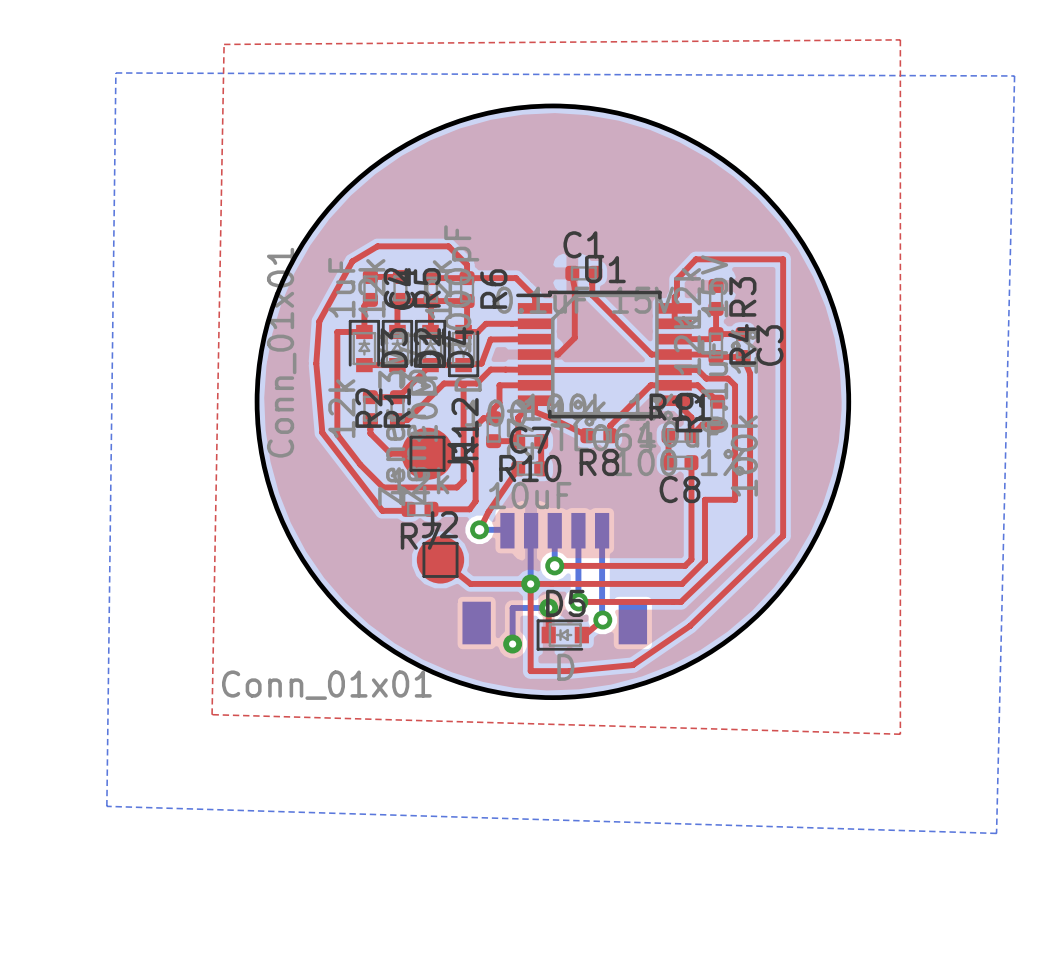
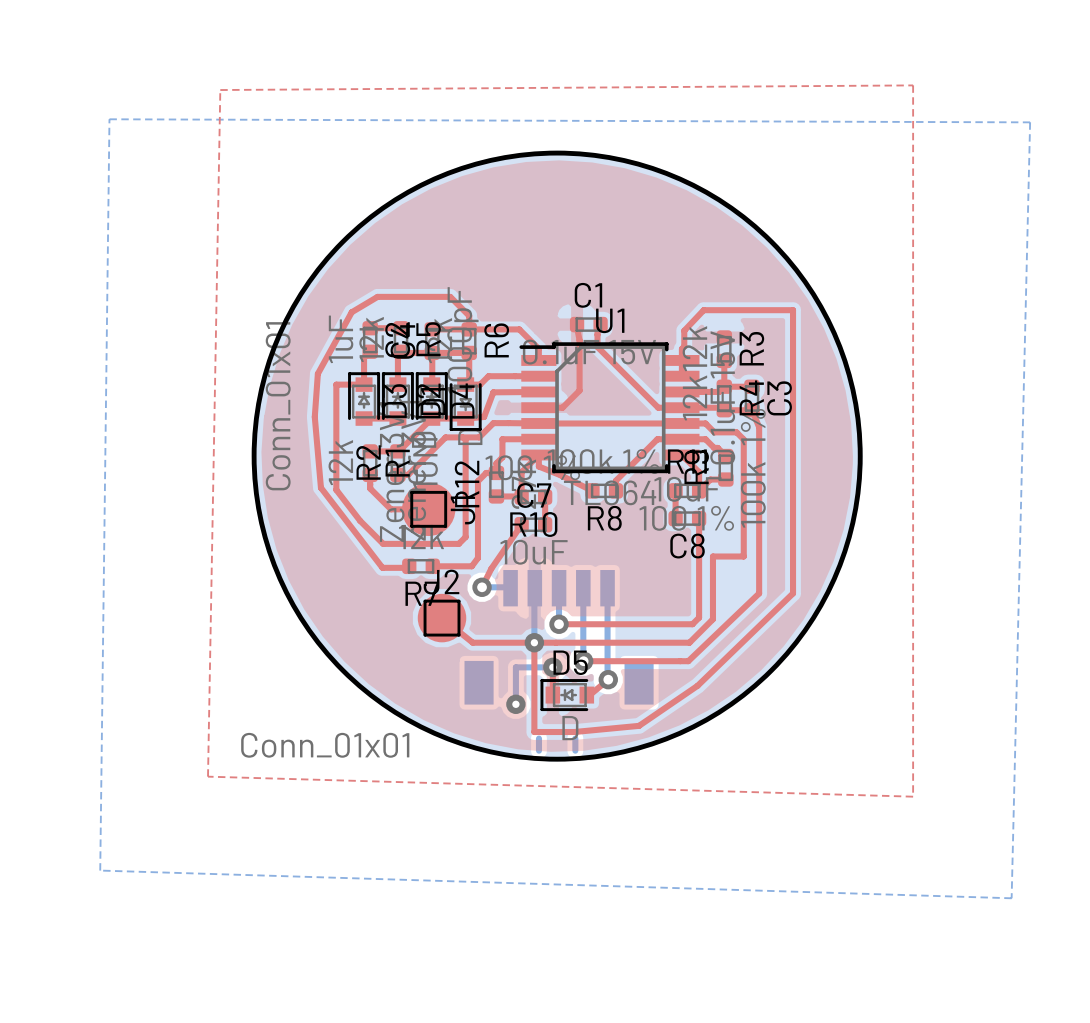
bottom track: none -> (538, 738) (538, 750)
bottom track: none -> (575, 738) (575, 750)

